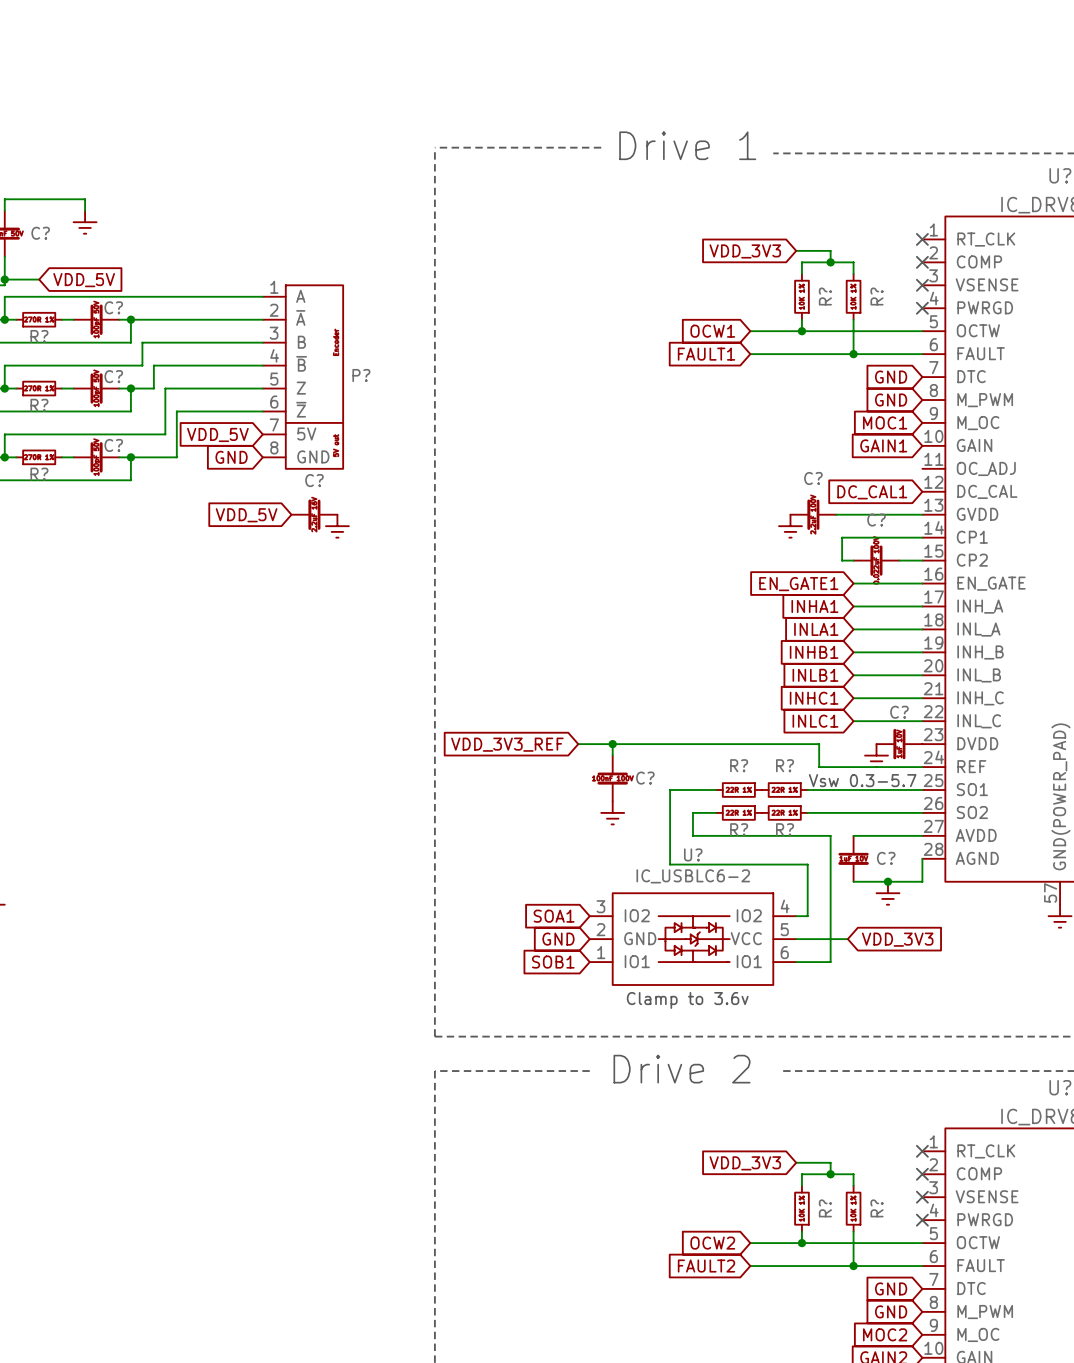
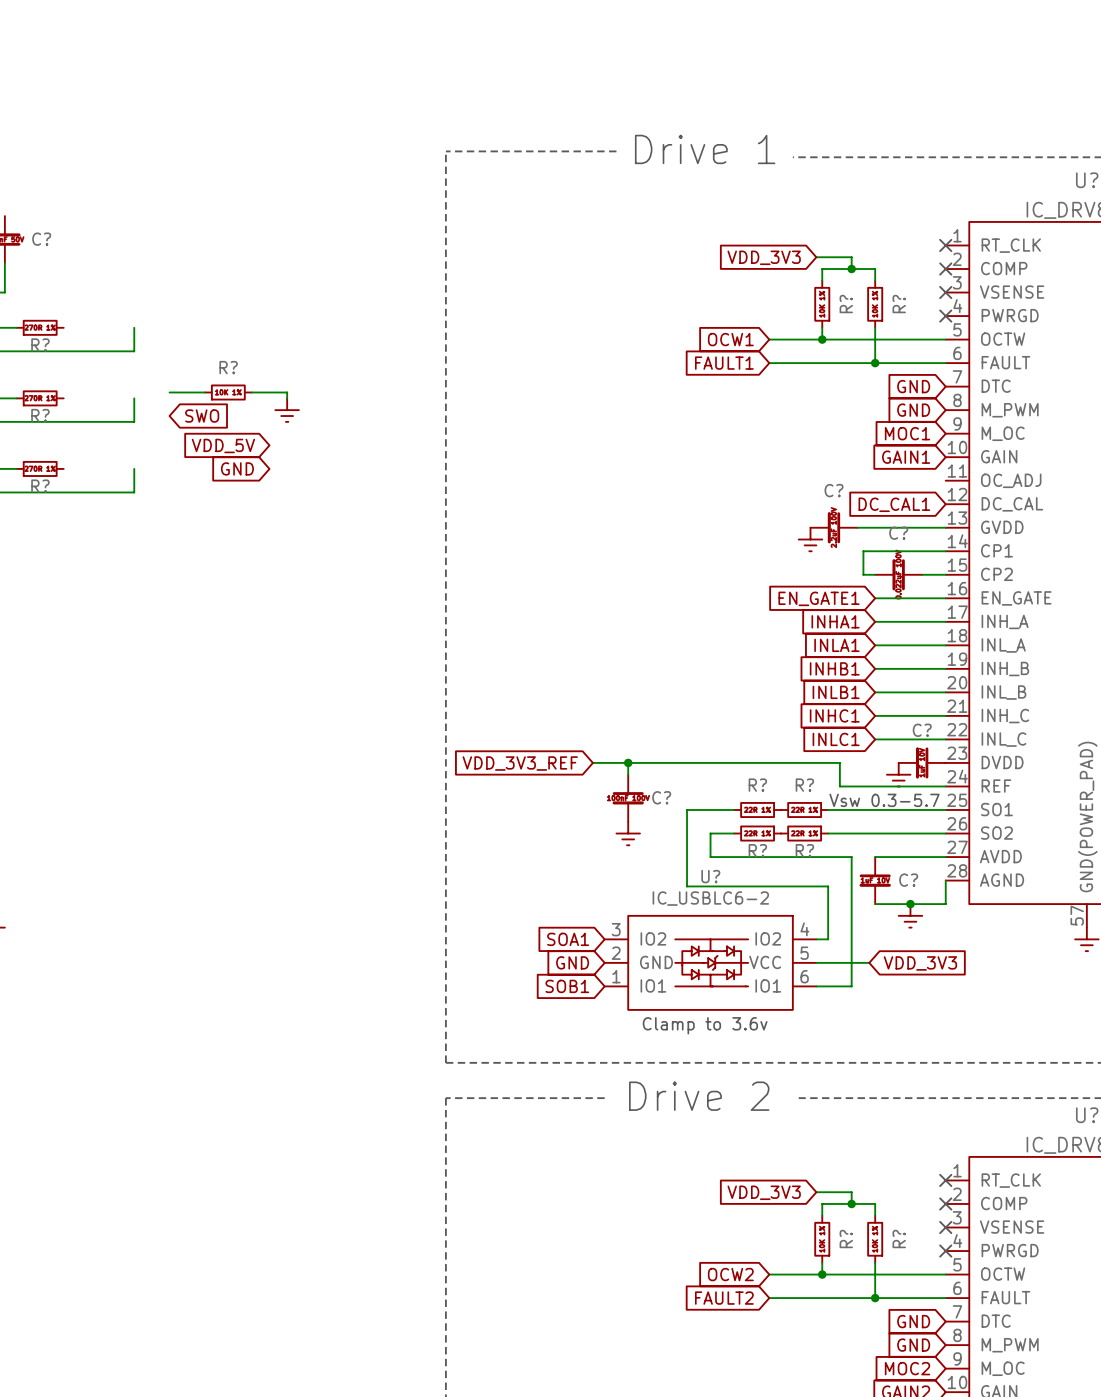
wire: (4, 210) (4, 199) (85, 199) (85, 210) -> none
power symbol: (85, 222) -> none
wire: (4, 279) (39, 279) -> (169, 392) (204, 392)
junction: (4, 279) -> none
global label: VDD_5V (84, 280) -> none
wire: (262, 296) (4, 296) (4, 319) -> none
junction: (4, 319) -> none
wire: (62, 319) (73, 319) -> none
C?: (96, 319) -> none
wire: (119, 319) (262, 319) -> none
junction: (130, 319) -> none
wire: (262, 342) (142, 342) (142, 365) (4, 365) (4, 388) -> none
wire: (262, 365) (153, 365) (153, 388) (119, 388) -> none
P?: (303, 377) -> none
R?: none -> (228, 392)
wire: none -> (251, 392) (287, 392) (287, 398)
junction: (4, 388) -> none
wire: (62, 388) (73, 388) -> none
C?: (96, 388) -> none
junction: (130, 388) -> none
wire: (262, 388) (165, 388) (165, 434) (4, 434) (4, 457) -> none
power symbol: none -> (287, 410)
global label: none -> SWO (202, 416)
wire: (262, 411) (176, 411) (176, 457) (119, 457) -> none
junction: (4, 457) -> none
wire: (62, 457) (73, 457) -> none
C?: (96, 457) -> none
junction: (130, 457) -> none
C?: (314, 514) -> none
global label: VDD_5V (246, 515) -> none
power symbol: (337, 526) -> none

